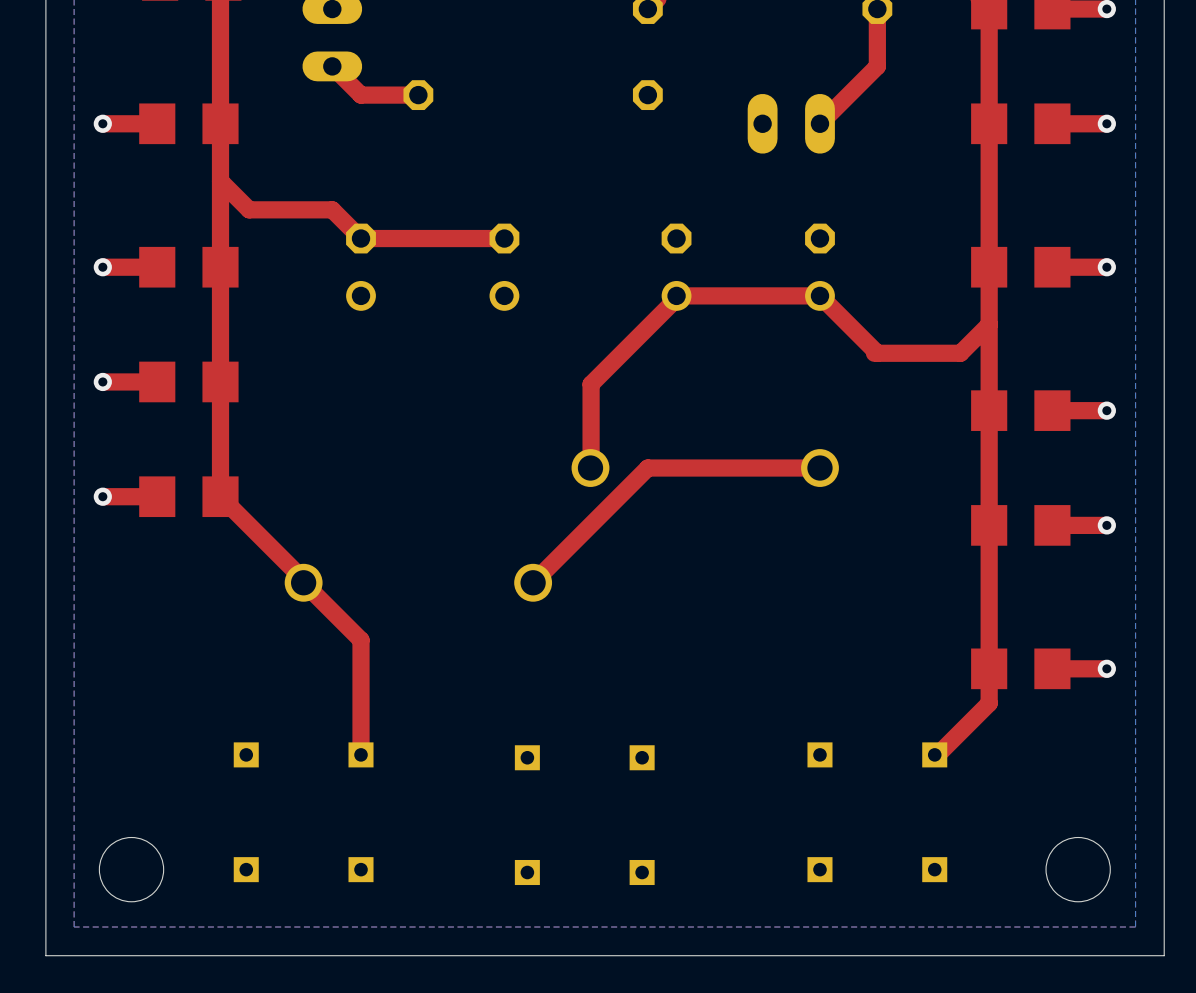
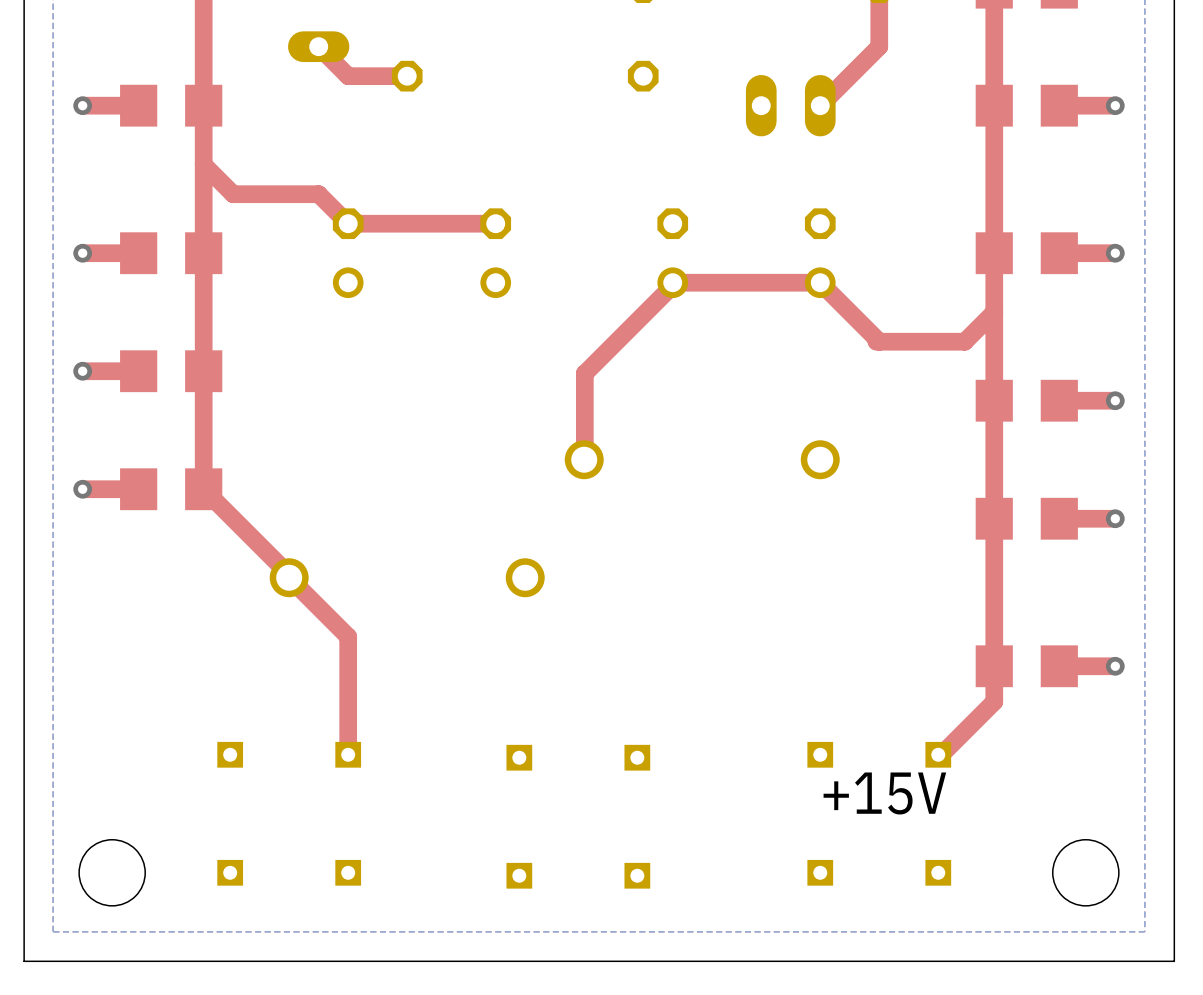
top track: (819, 468) (647, 468) (533, 582) -> none
text: none -> +15V (884, 793)

